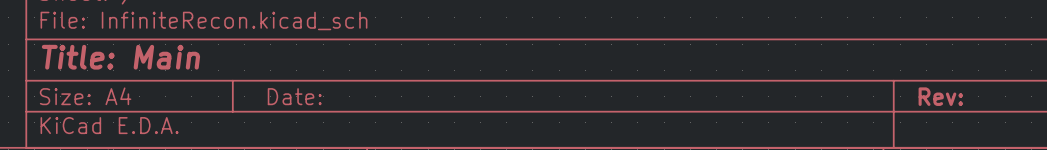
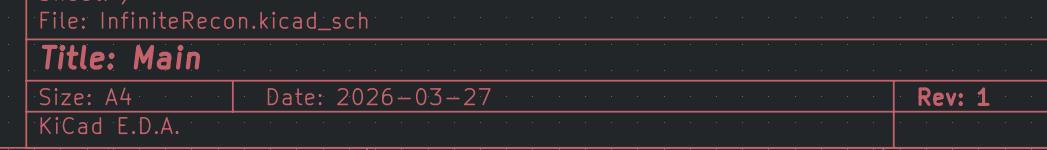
title block: Date: (294, 96) -> Date: 2026-03-27 (379, 96)
title block: Rev: (940, 96) -> Rev: 1 (954, 96)

